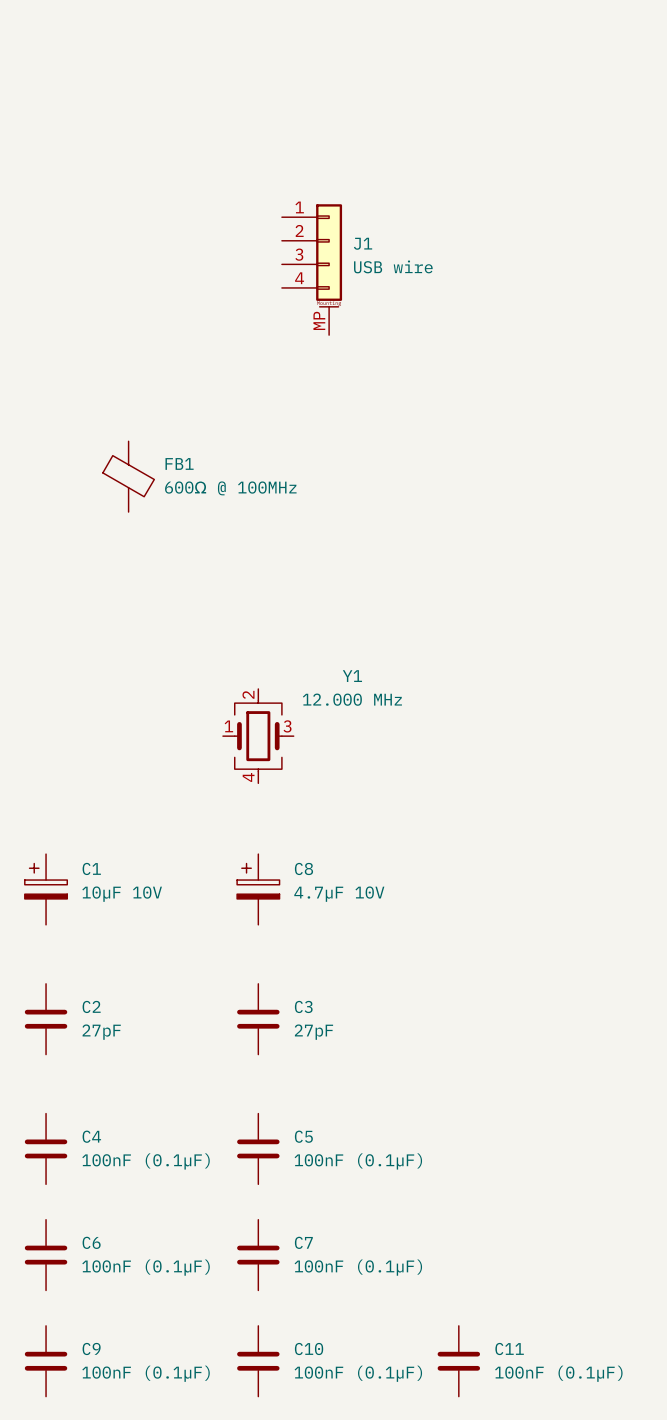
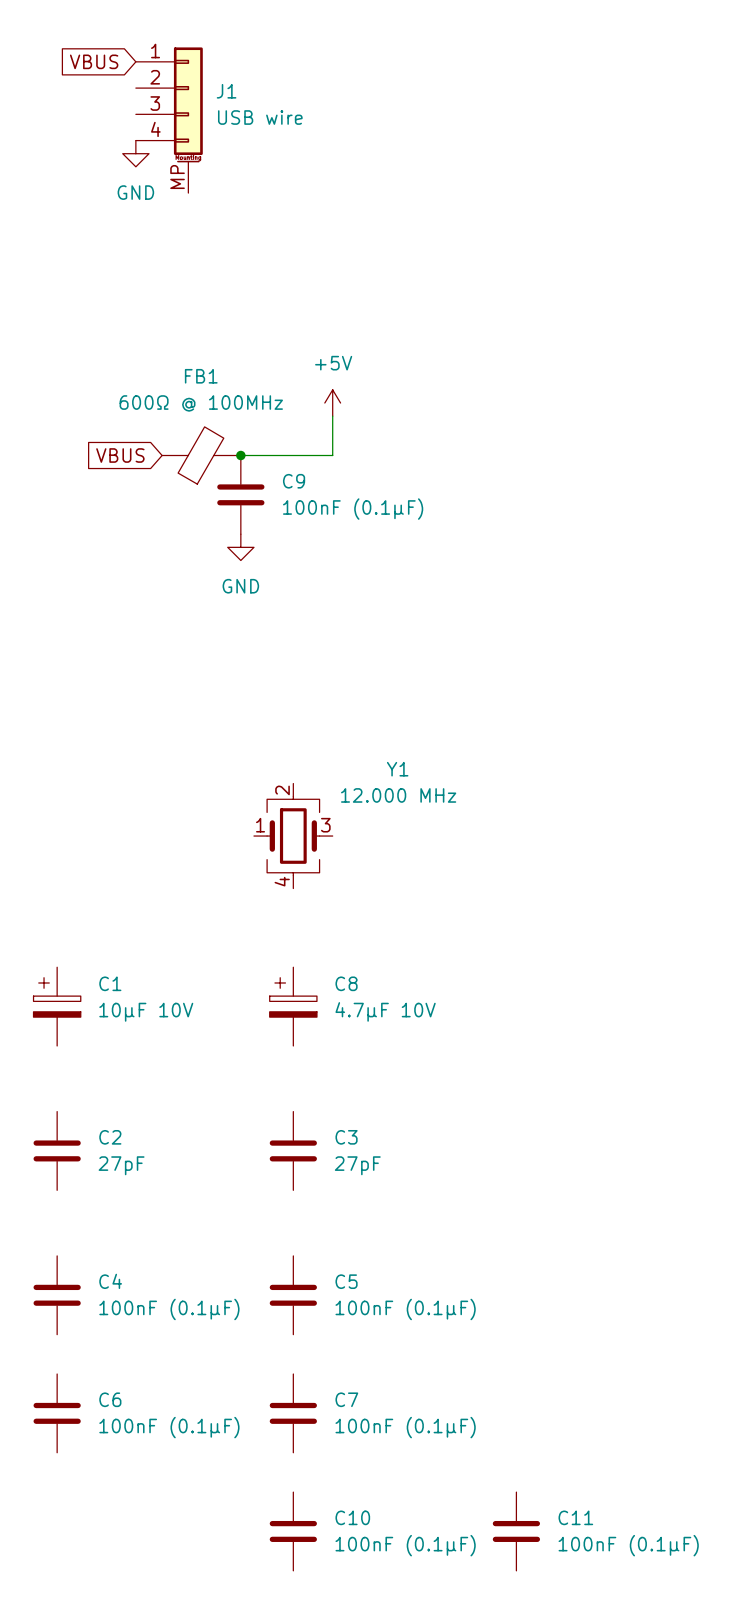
global label: none -> VBUS (94, 61)
power symbol: none -> GND (135, 153)
J1 position: (311, 269) -> (169, 120)
power symbol: none -> +5V (332, 403)
wire: none -> (332, 416) (332, 455) (240, 455)
global label: none -> VBUS (120, 455)
junction: none -> (240, 455)
FB1 name position: FB1 (179, 463) -> FB1 (201, 376)
FB1 rotation: 0° (128, 476) -> 90° counterclockwise (200, 455)
FB1 position: (128, 476) -> (201, 455)
power symbol: none -> GND (240, 547)
FB1 value position: 600Ω @ 100MHz (230, 488) -> 600Ω @ 100MHz (201, 403)
C9 position: (46, 1361) -> (240, 494)

